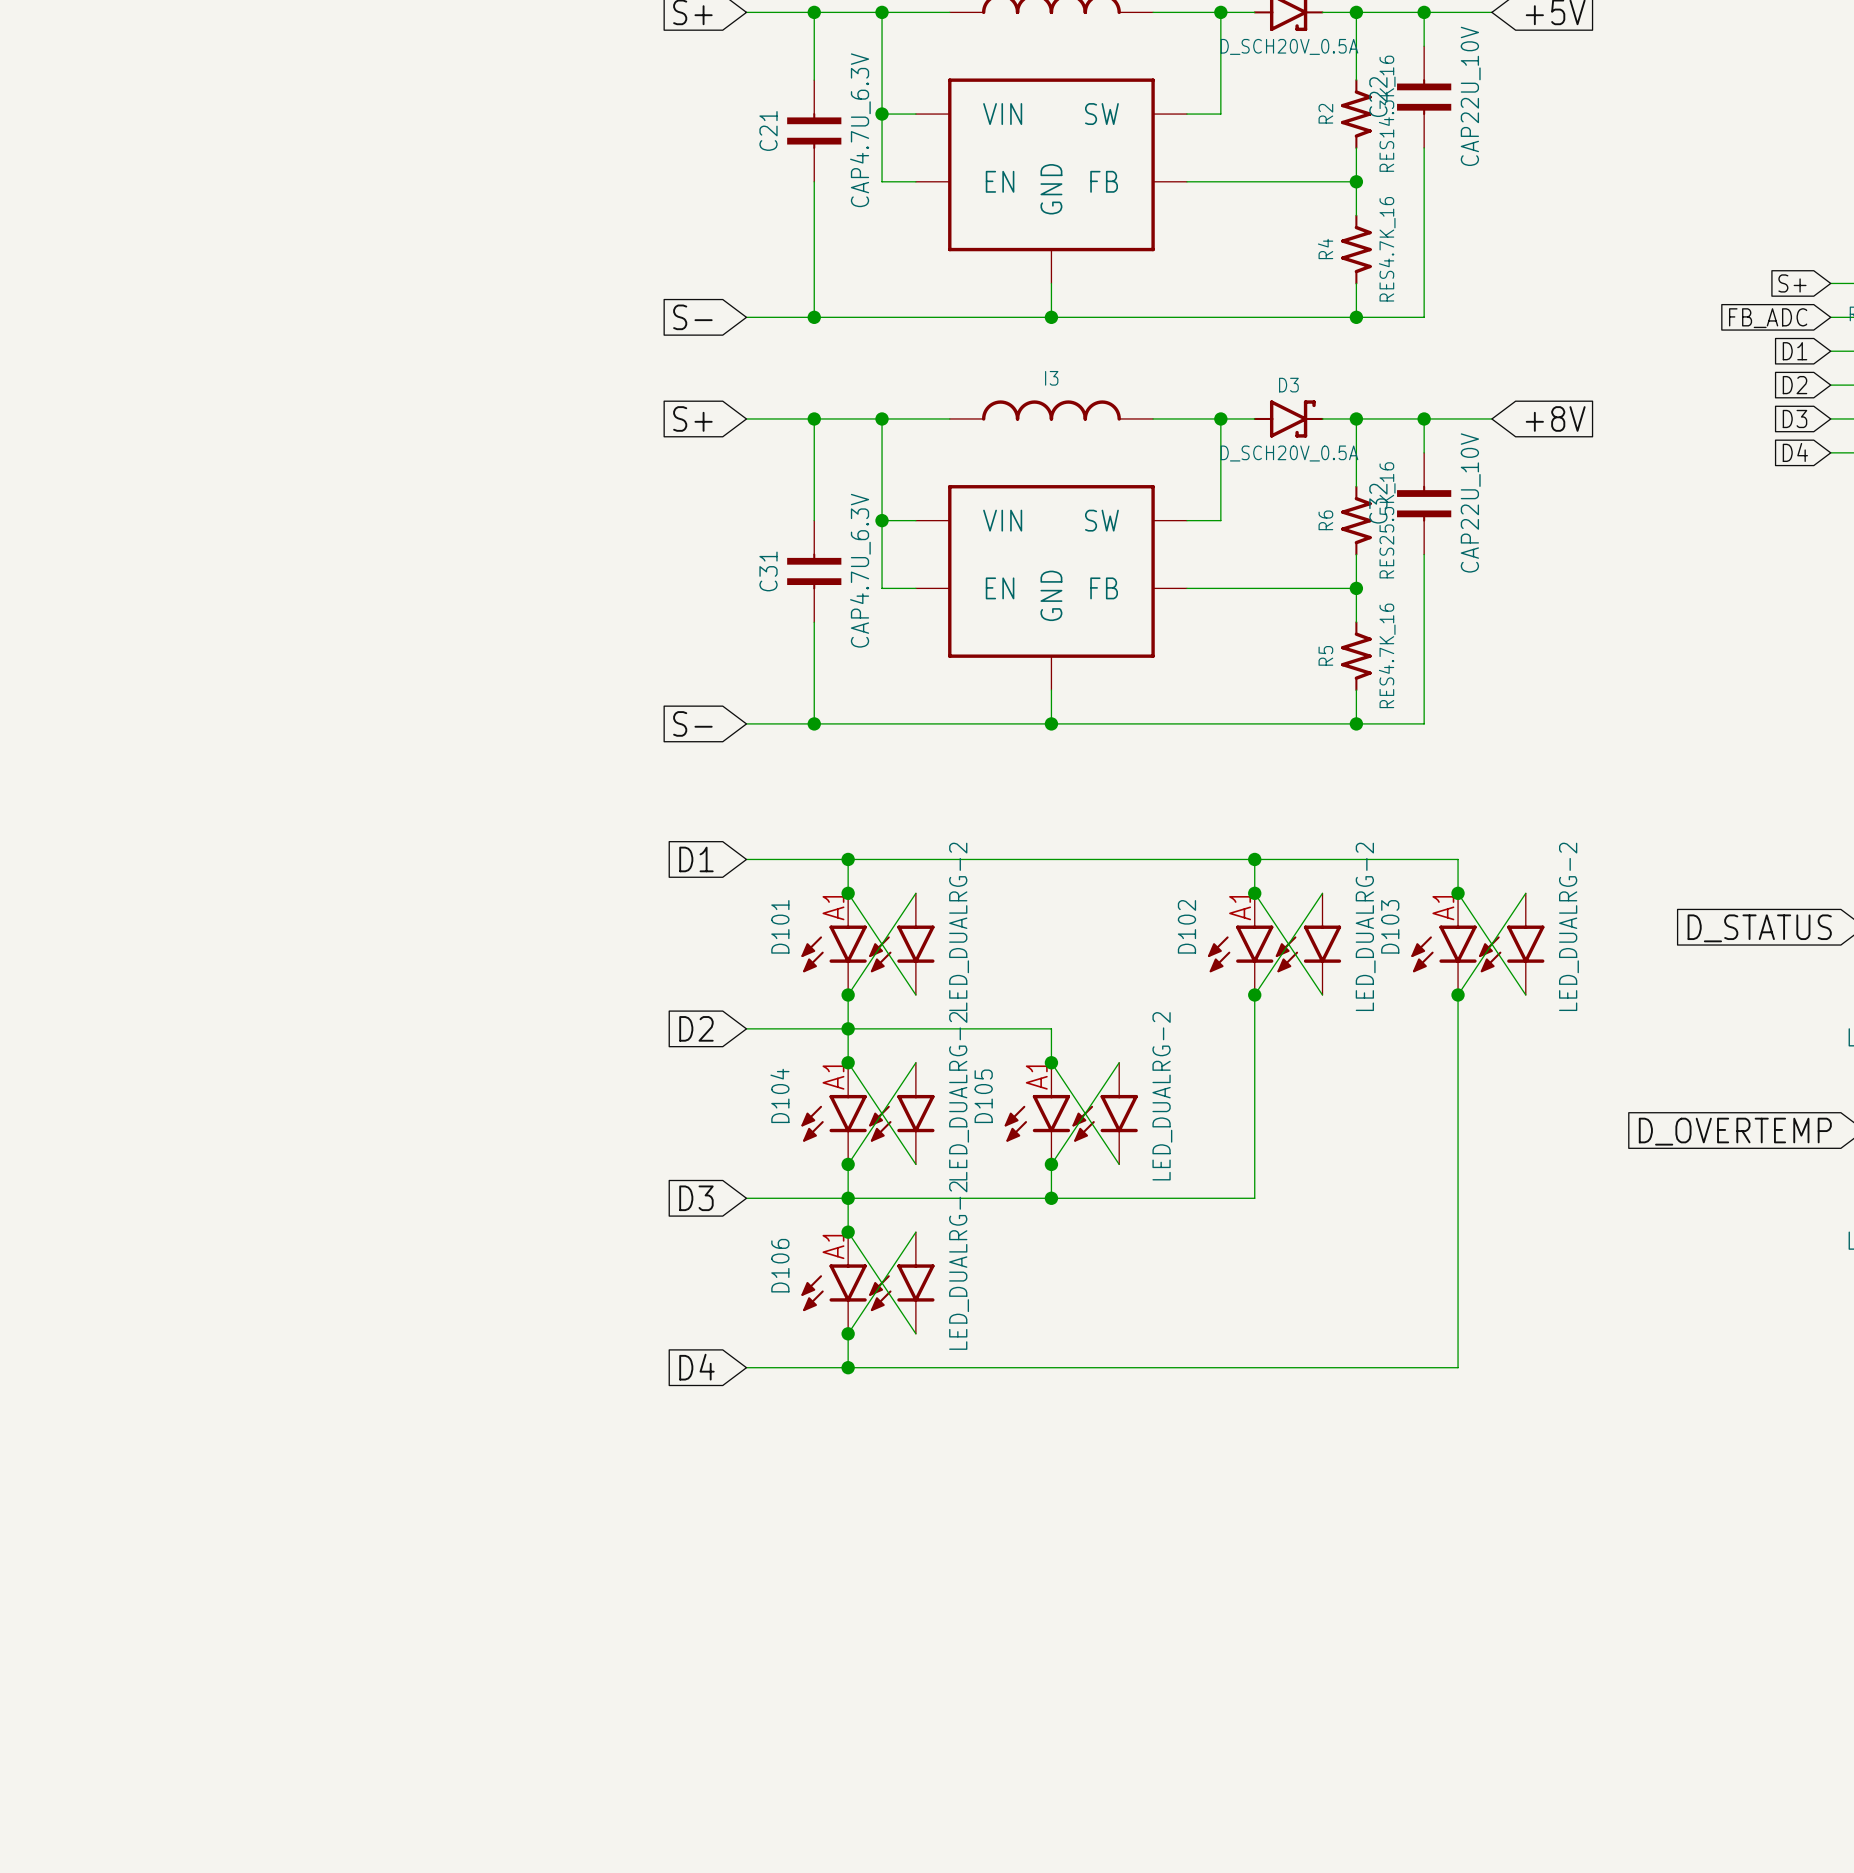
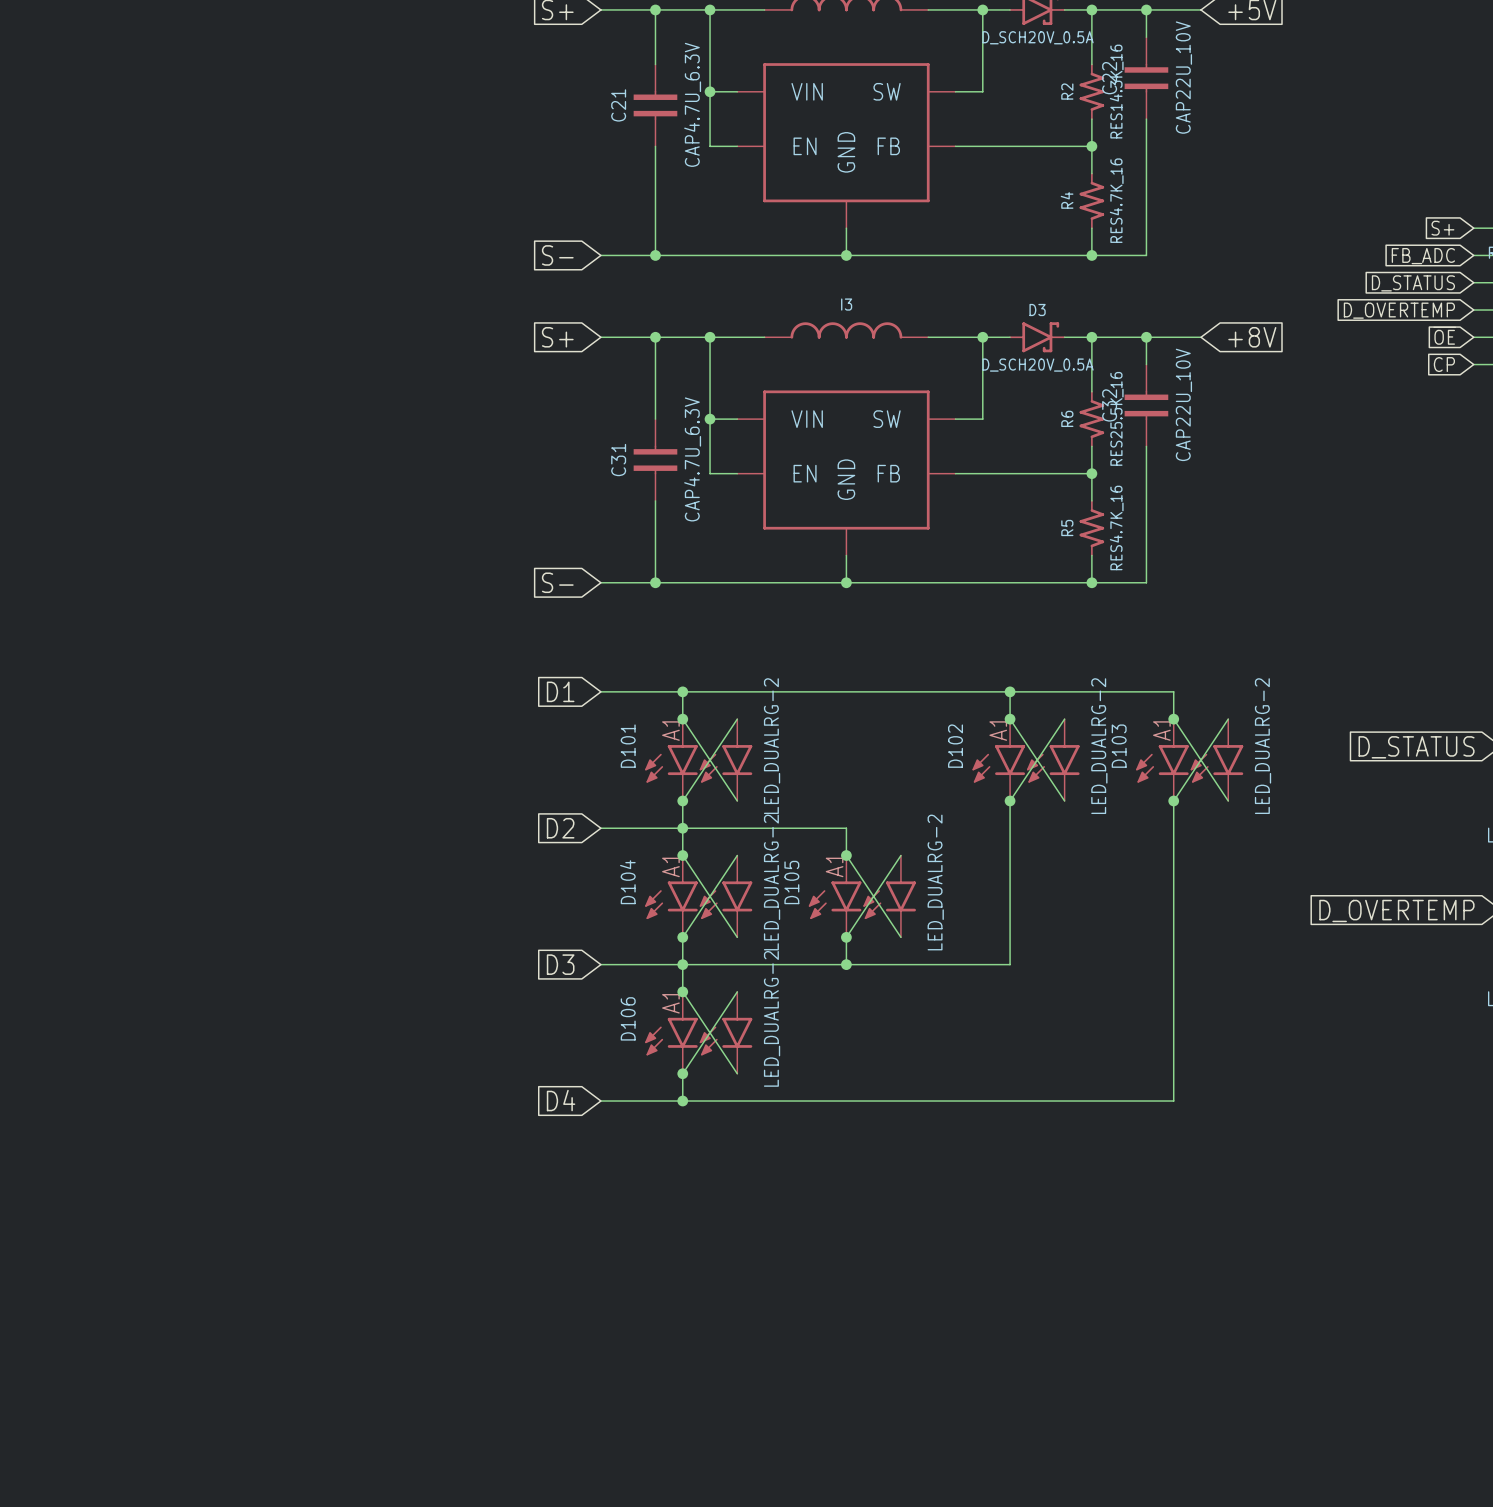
global label: D1 (1795, 351) -> D_STATUS (1413, 283)
global label: D2 (1795, 385) -> D_OVERTEMP (1399, 310)
global label: D3 (1795, 418) -> ~{OE} (1444, 335)
global label: D4 (1795, 452) -> CP (1444, 364)

